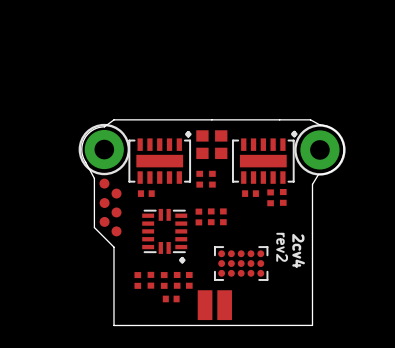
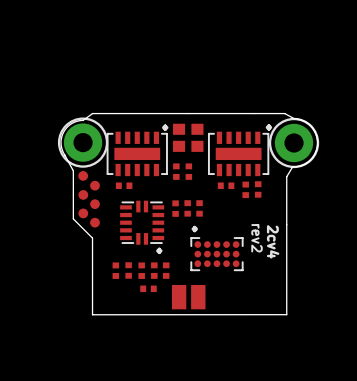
text: none -> . (194, 229)
part footprint: [197, 290, 213, 321] -> [171, 284, 187, 310]
part footprint: [217, 290, 232, 321] -> [191, 284, 206, 310]

